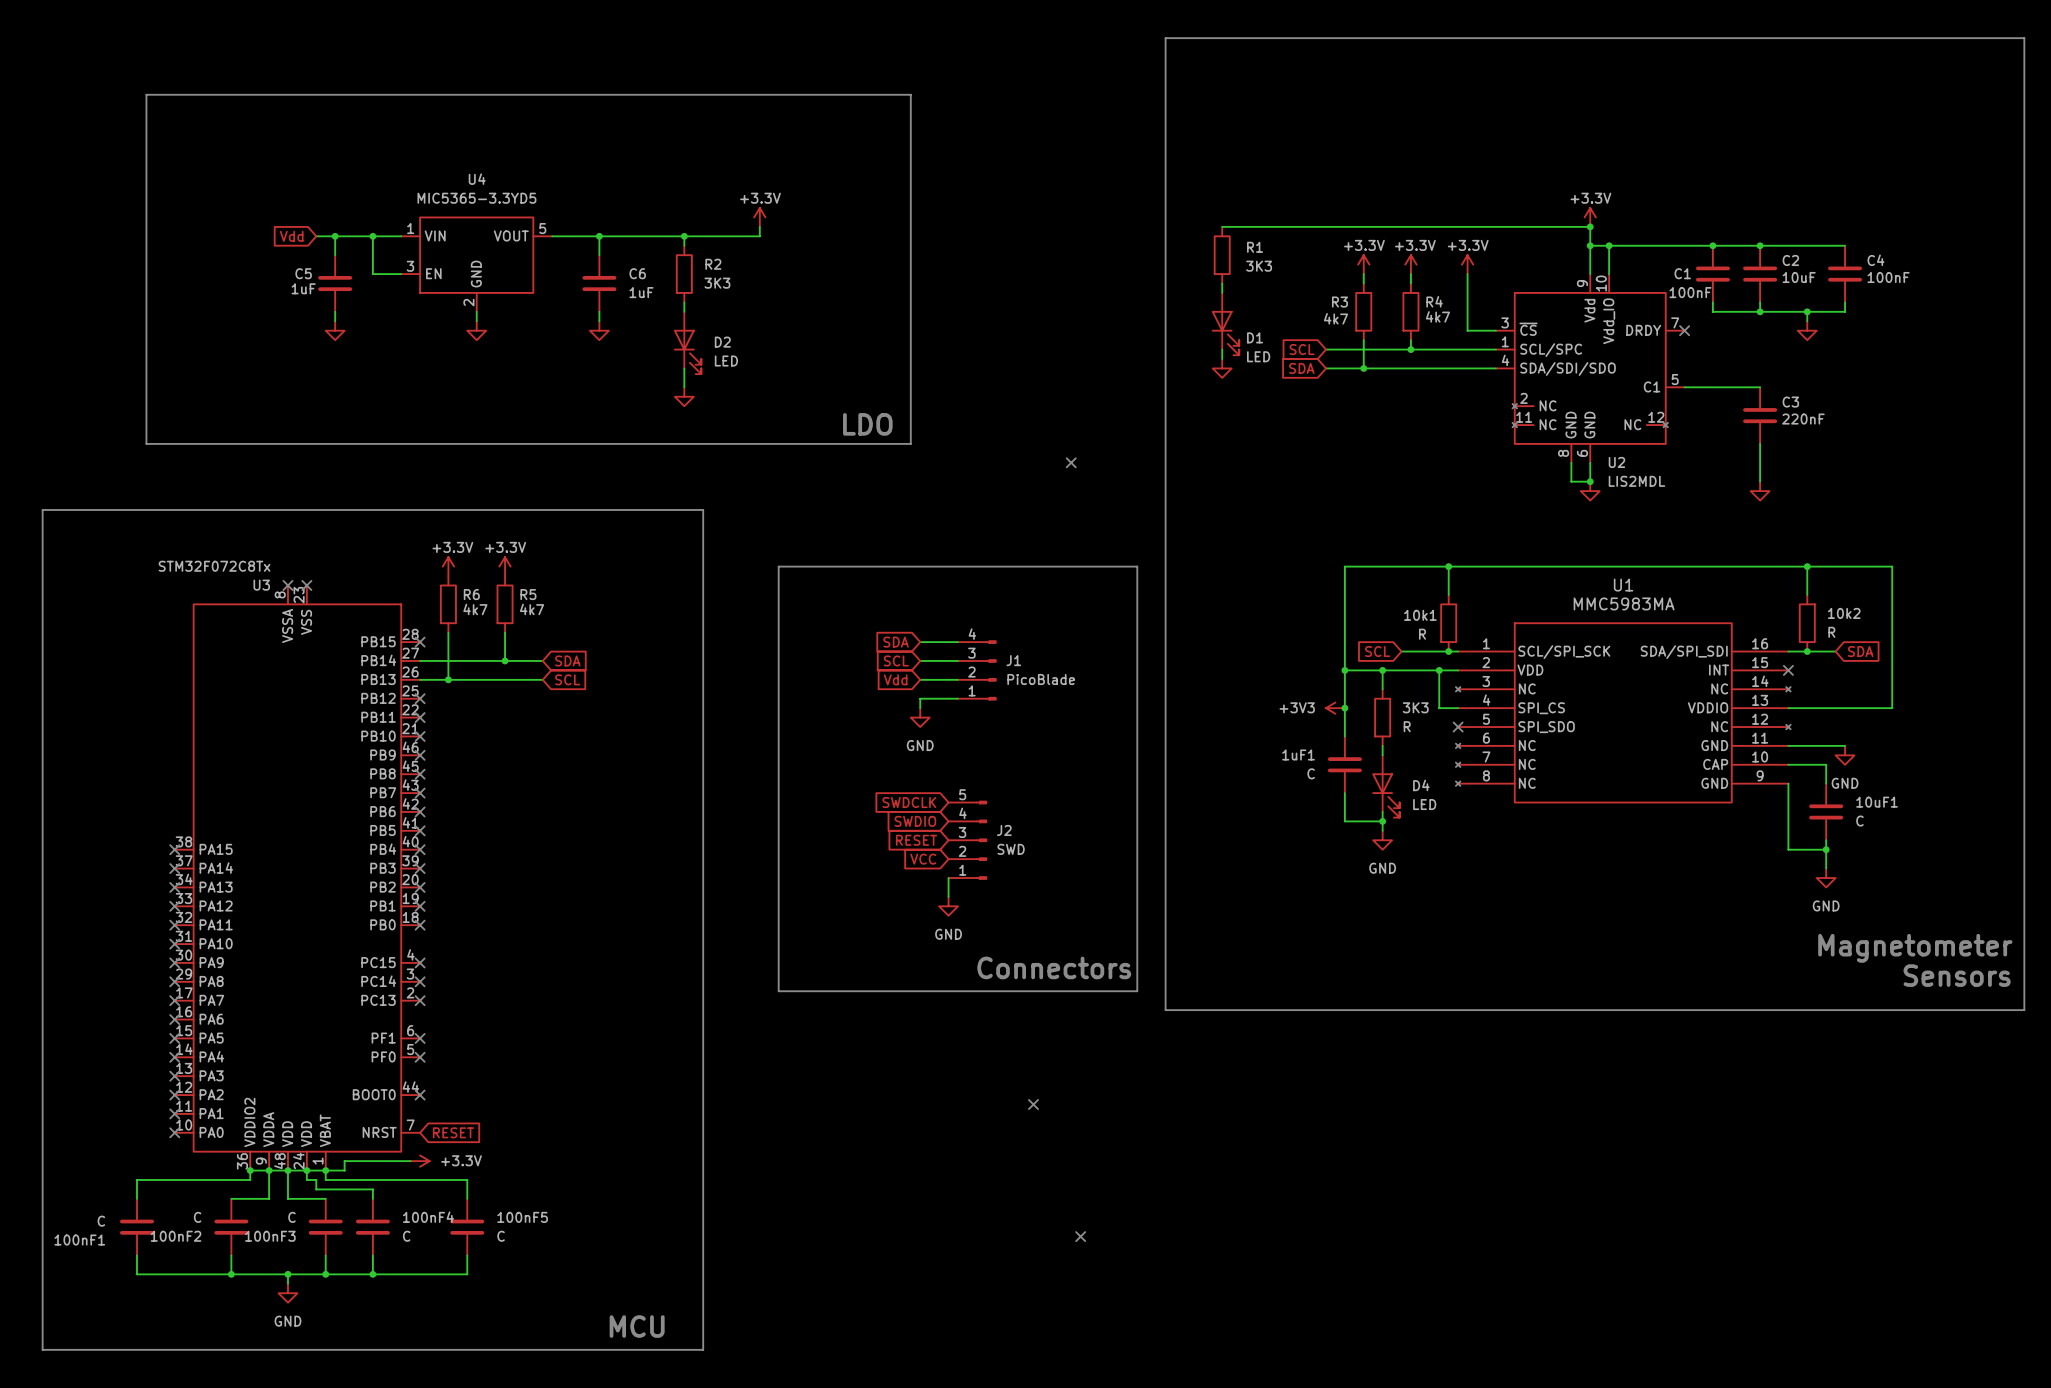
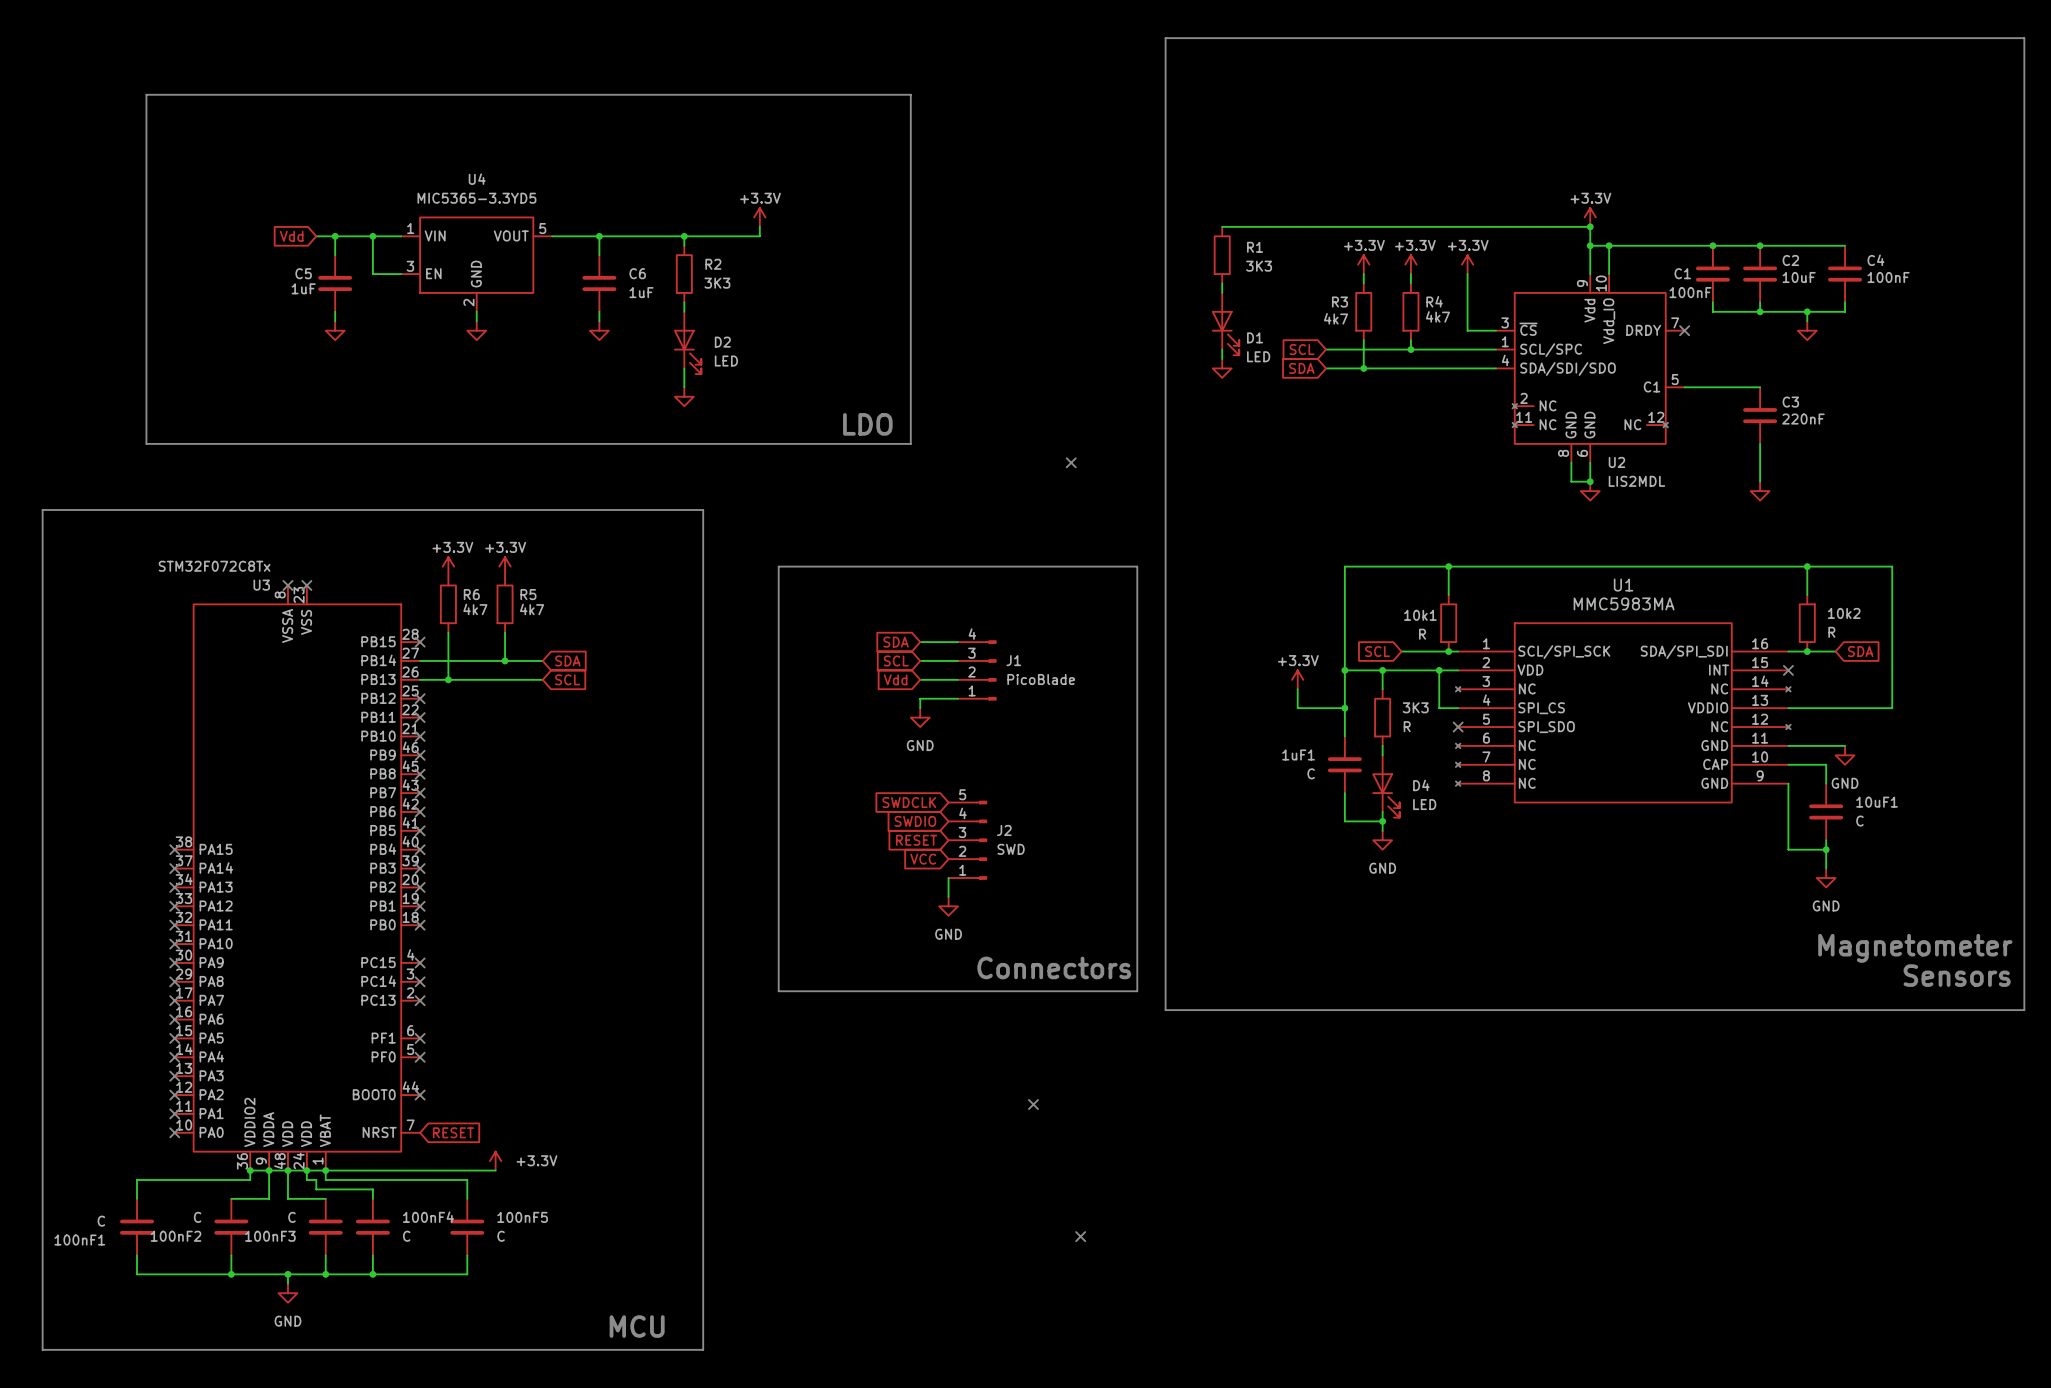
power symbol: none -> +3.3V (1297, 679)
wire: none -> (1297, 689) (1297, 708) (1344, 708)
power symbol: +3V3 (1335, 708) -> none
wire: (410, 1161) (344, 1161) (344, 1170) -> (495, 1170) (344, 1170)
power symbol rotation: 0° (420, 1161) -> 90° counterclockwise (495, 1161)
power symbol position: +3.3V (420, 1161) -> +3.3V (495, 1161)

